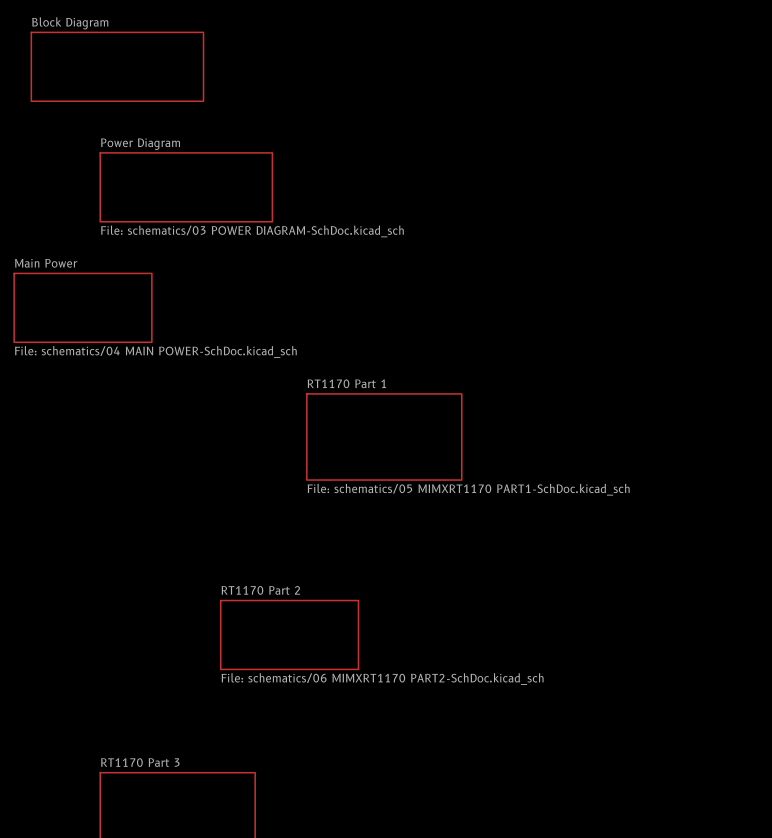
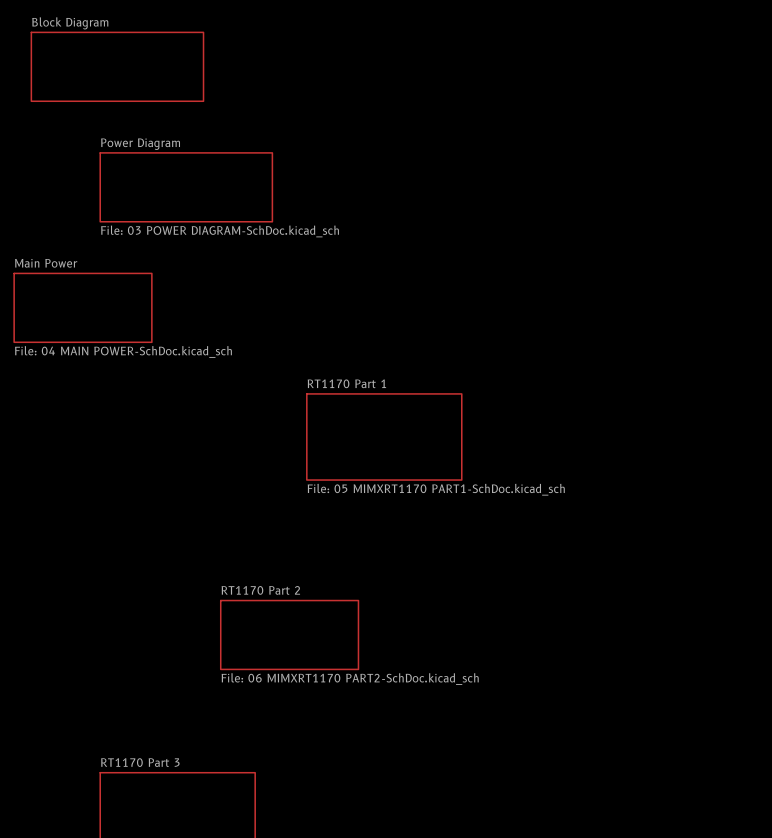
sheet Power Diagram value: File: schematics/03 POWER DIAGRAM-SchDoc.kicad_sch (252, 231) -> File: 03 POWER DIAGRAM-SchDoc.kicad_sch (220, 231)
sheet Main Power value: File: schematics/04 MAIN POWER-SchDoc.kicad_sch (155, 351) -> File: 04 MAIN POWER-SchDoc.kicad_sch (123, 351)
sheet RT1170 Part 1 value: File: schematics/05 MIMXRT1170 PART1-SchDoc.kicad_sch (468, 489) -> File: 05 MIMXRT1170 PART1-SchDoc.kicad_sch (436, 489)
sheet RT1170 Part 2 value: File: schematics/06 MIMXRT1170 PART2-SchDoc.kicad_sch (382, 679) -> File: 06 MIMXRT1170 PART2-SchDoc.kicad_sch (350, 679)

